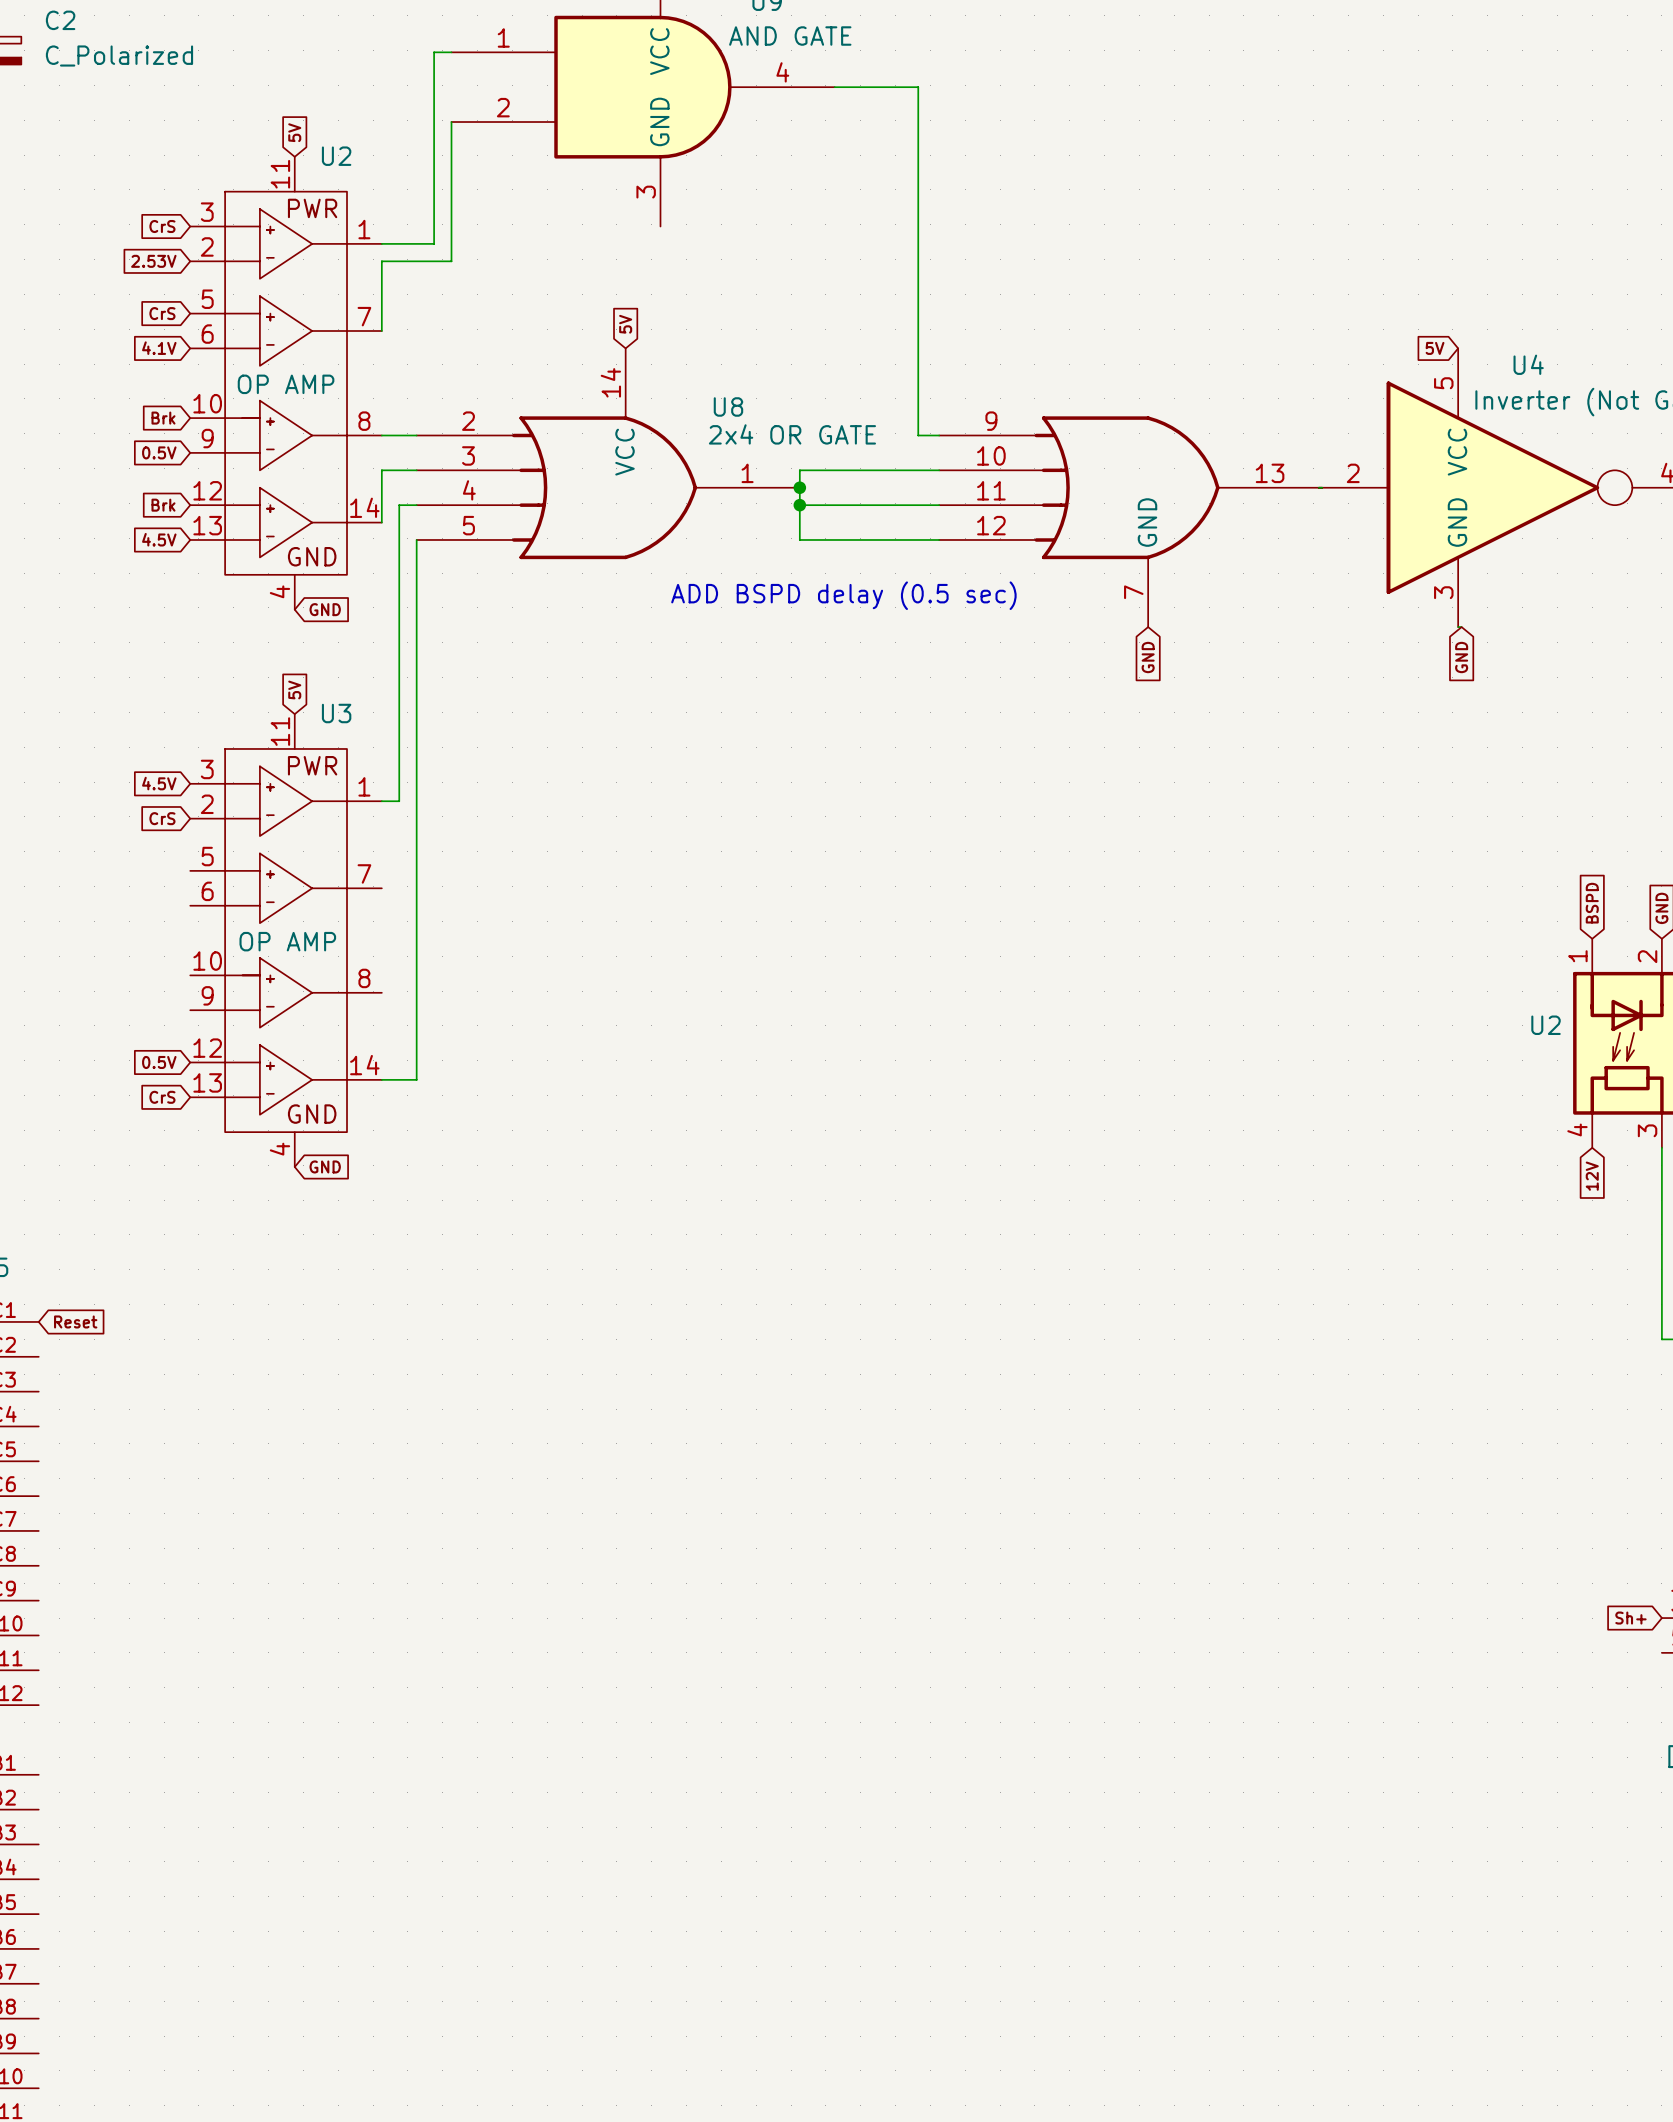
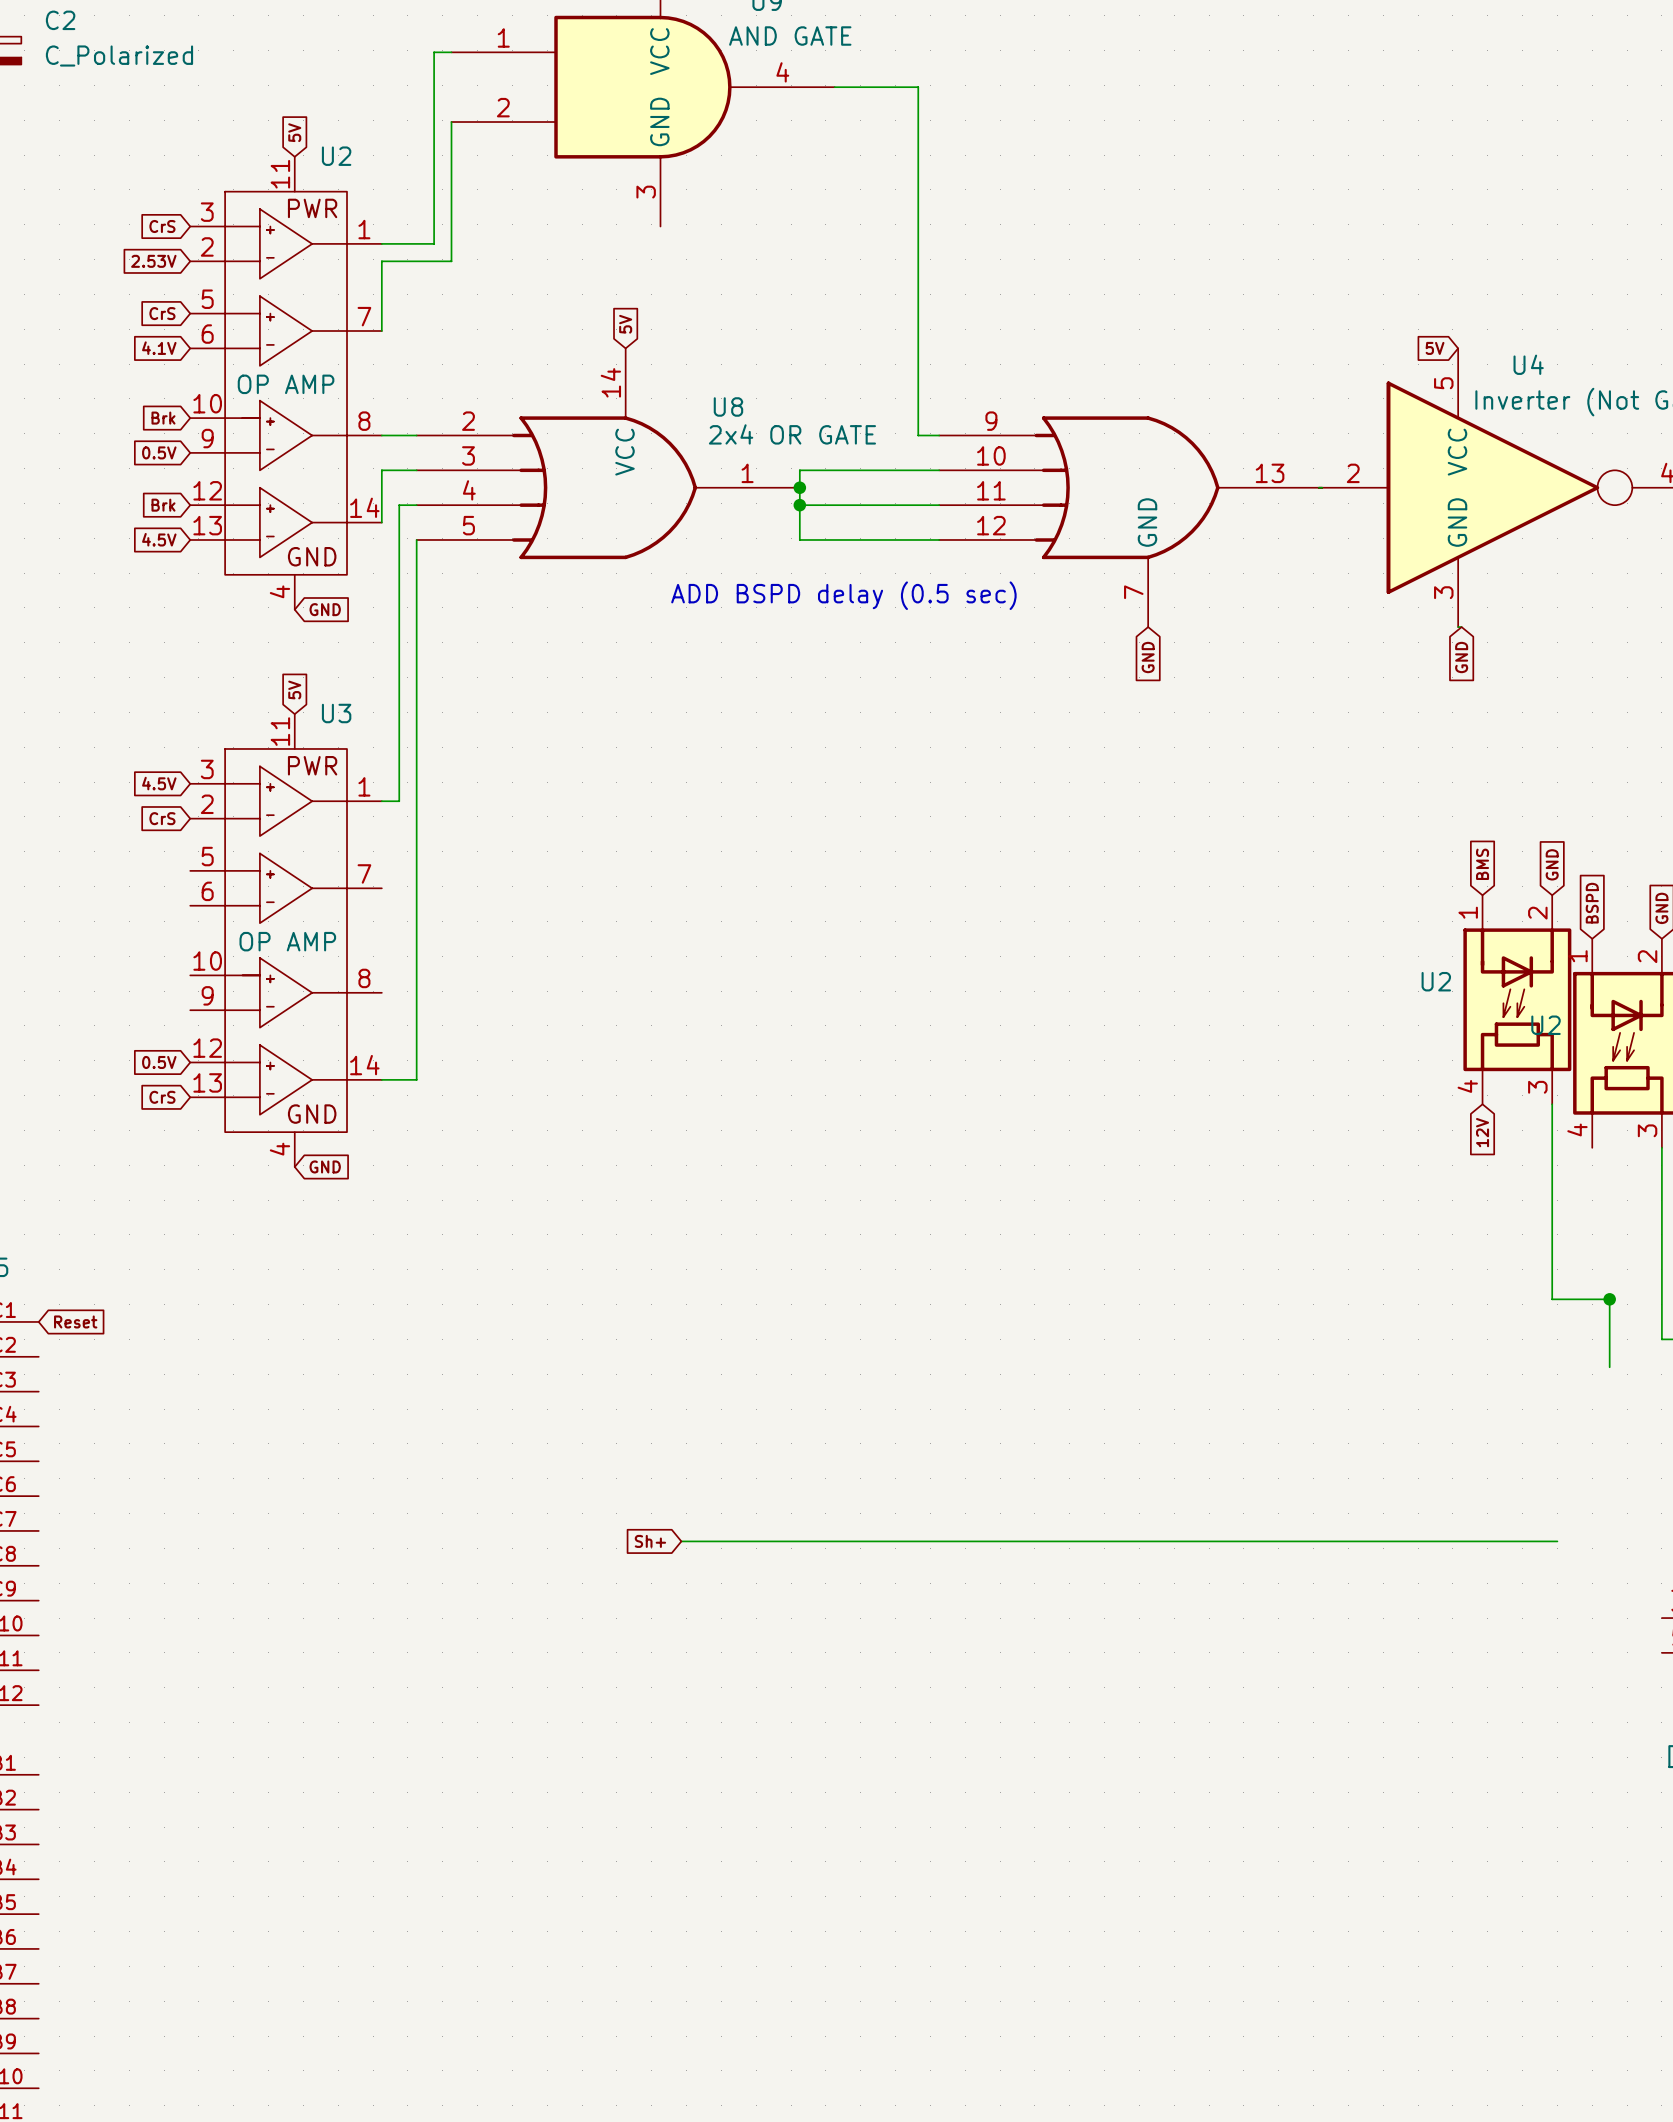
global label: none -> BMS (1482, 864)
global label: none -> GND (1552, 864)
U2: none -> (1517, 999)
wire: none -> (1552, 1104) (1552, 1299) (1609, 1299) (1609, 1367)
global label: none -> 12V (1482, 1132)
global label: 12V (1592, 1176) -> none
junction: none -> (1609, 1299)
global label: none -> Sh+ (650, 1541)
wire: none -> (681, 1541) (1557, 1541)
global label: Sh+ (1630, 1618) -> none

